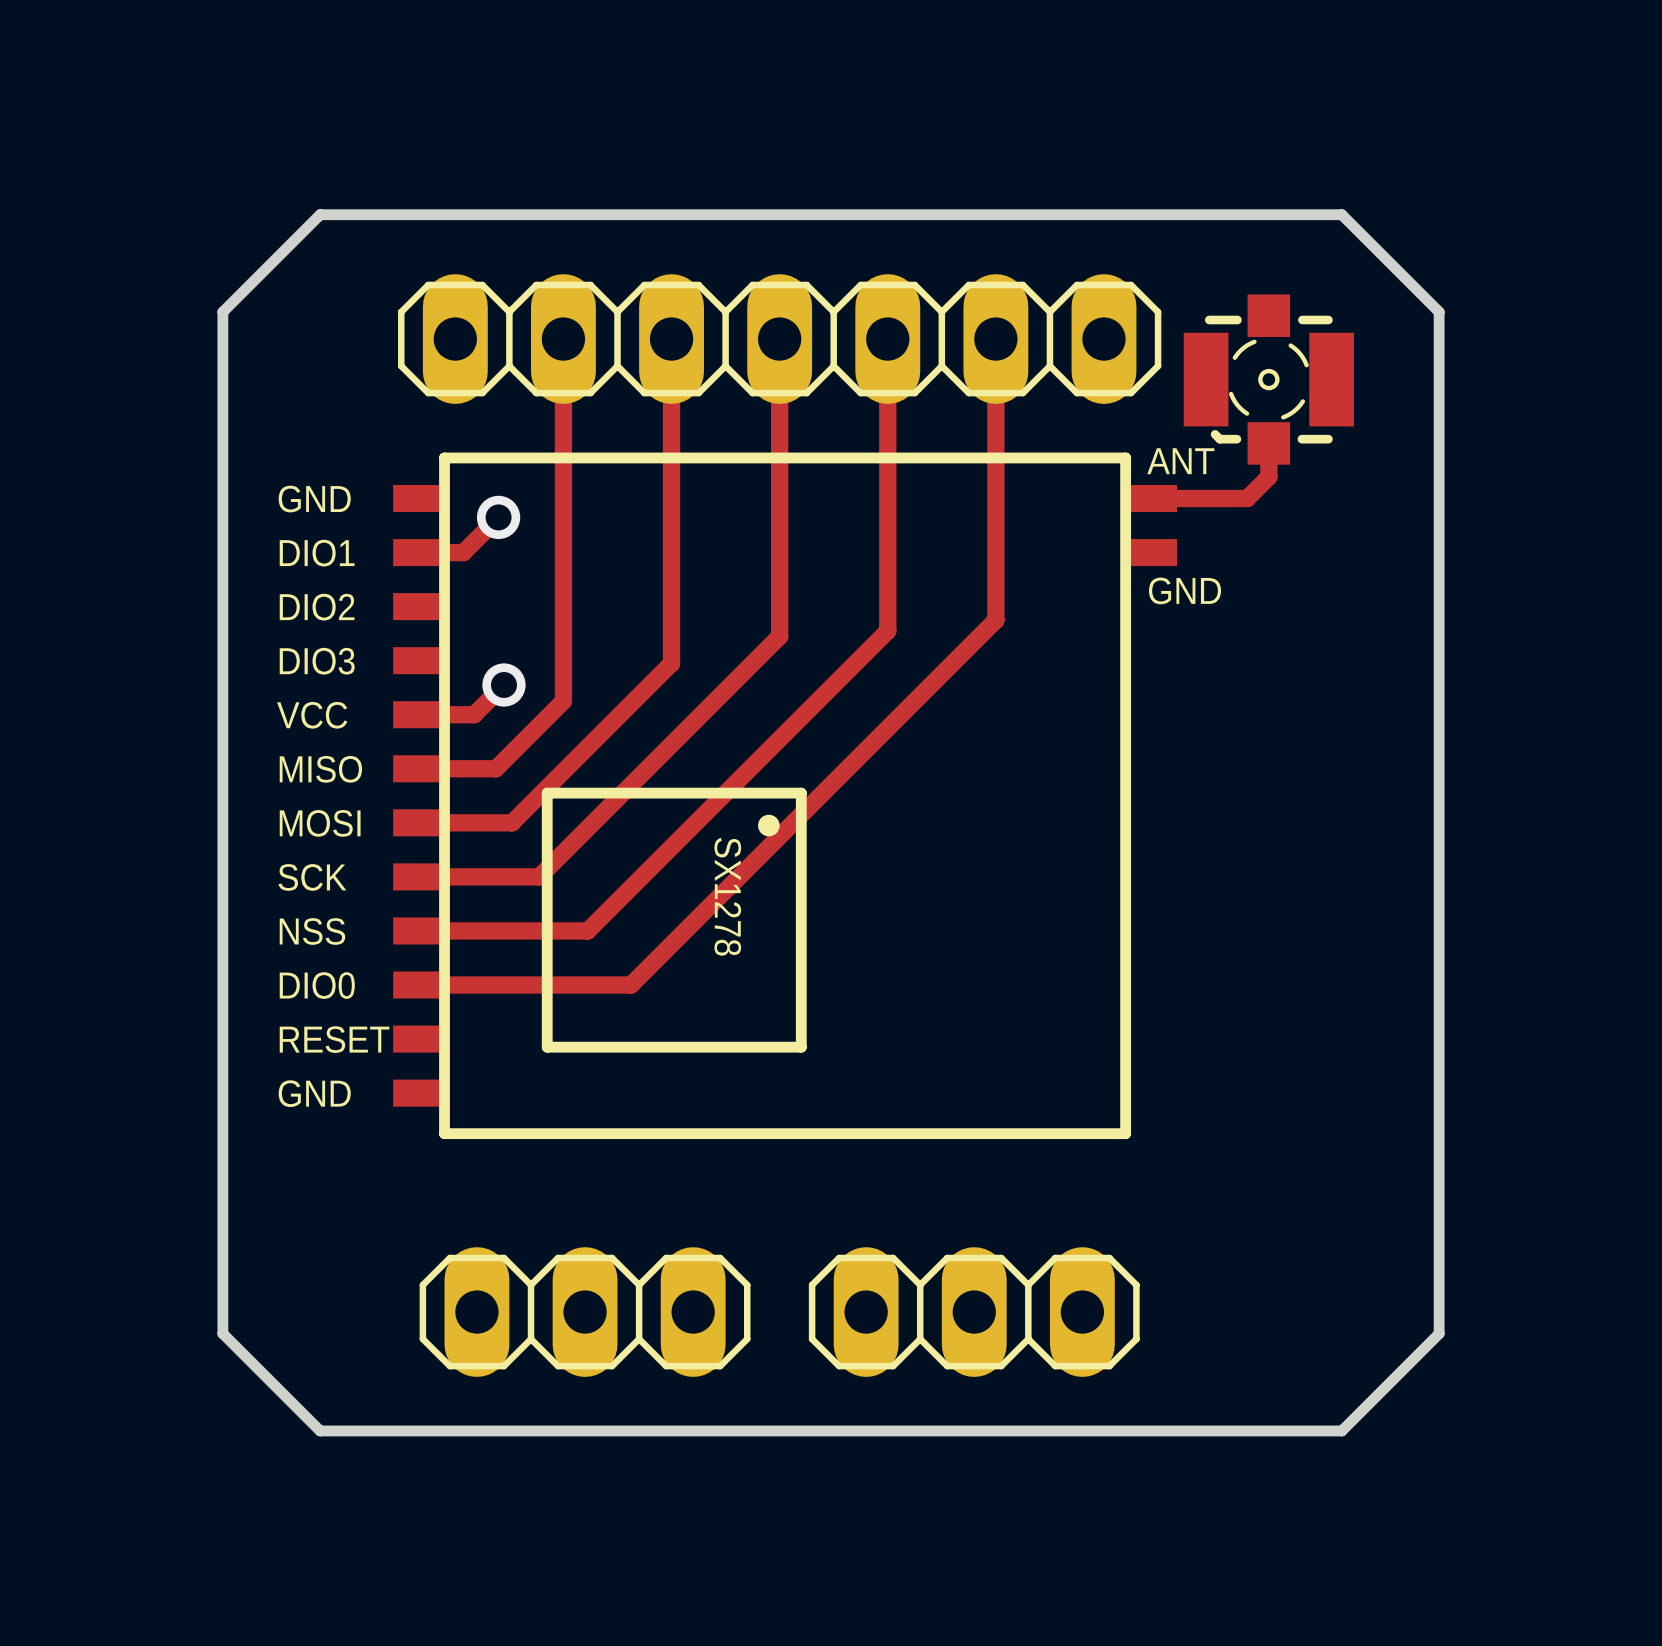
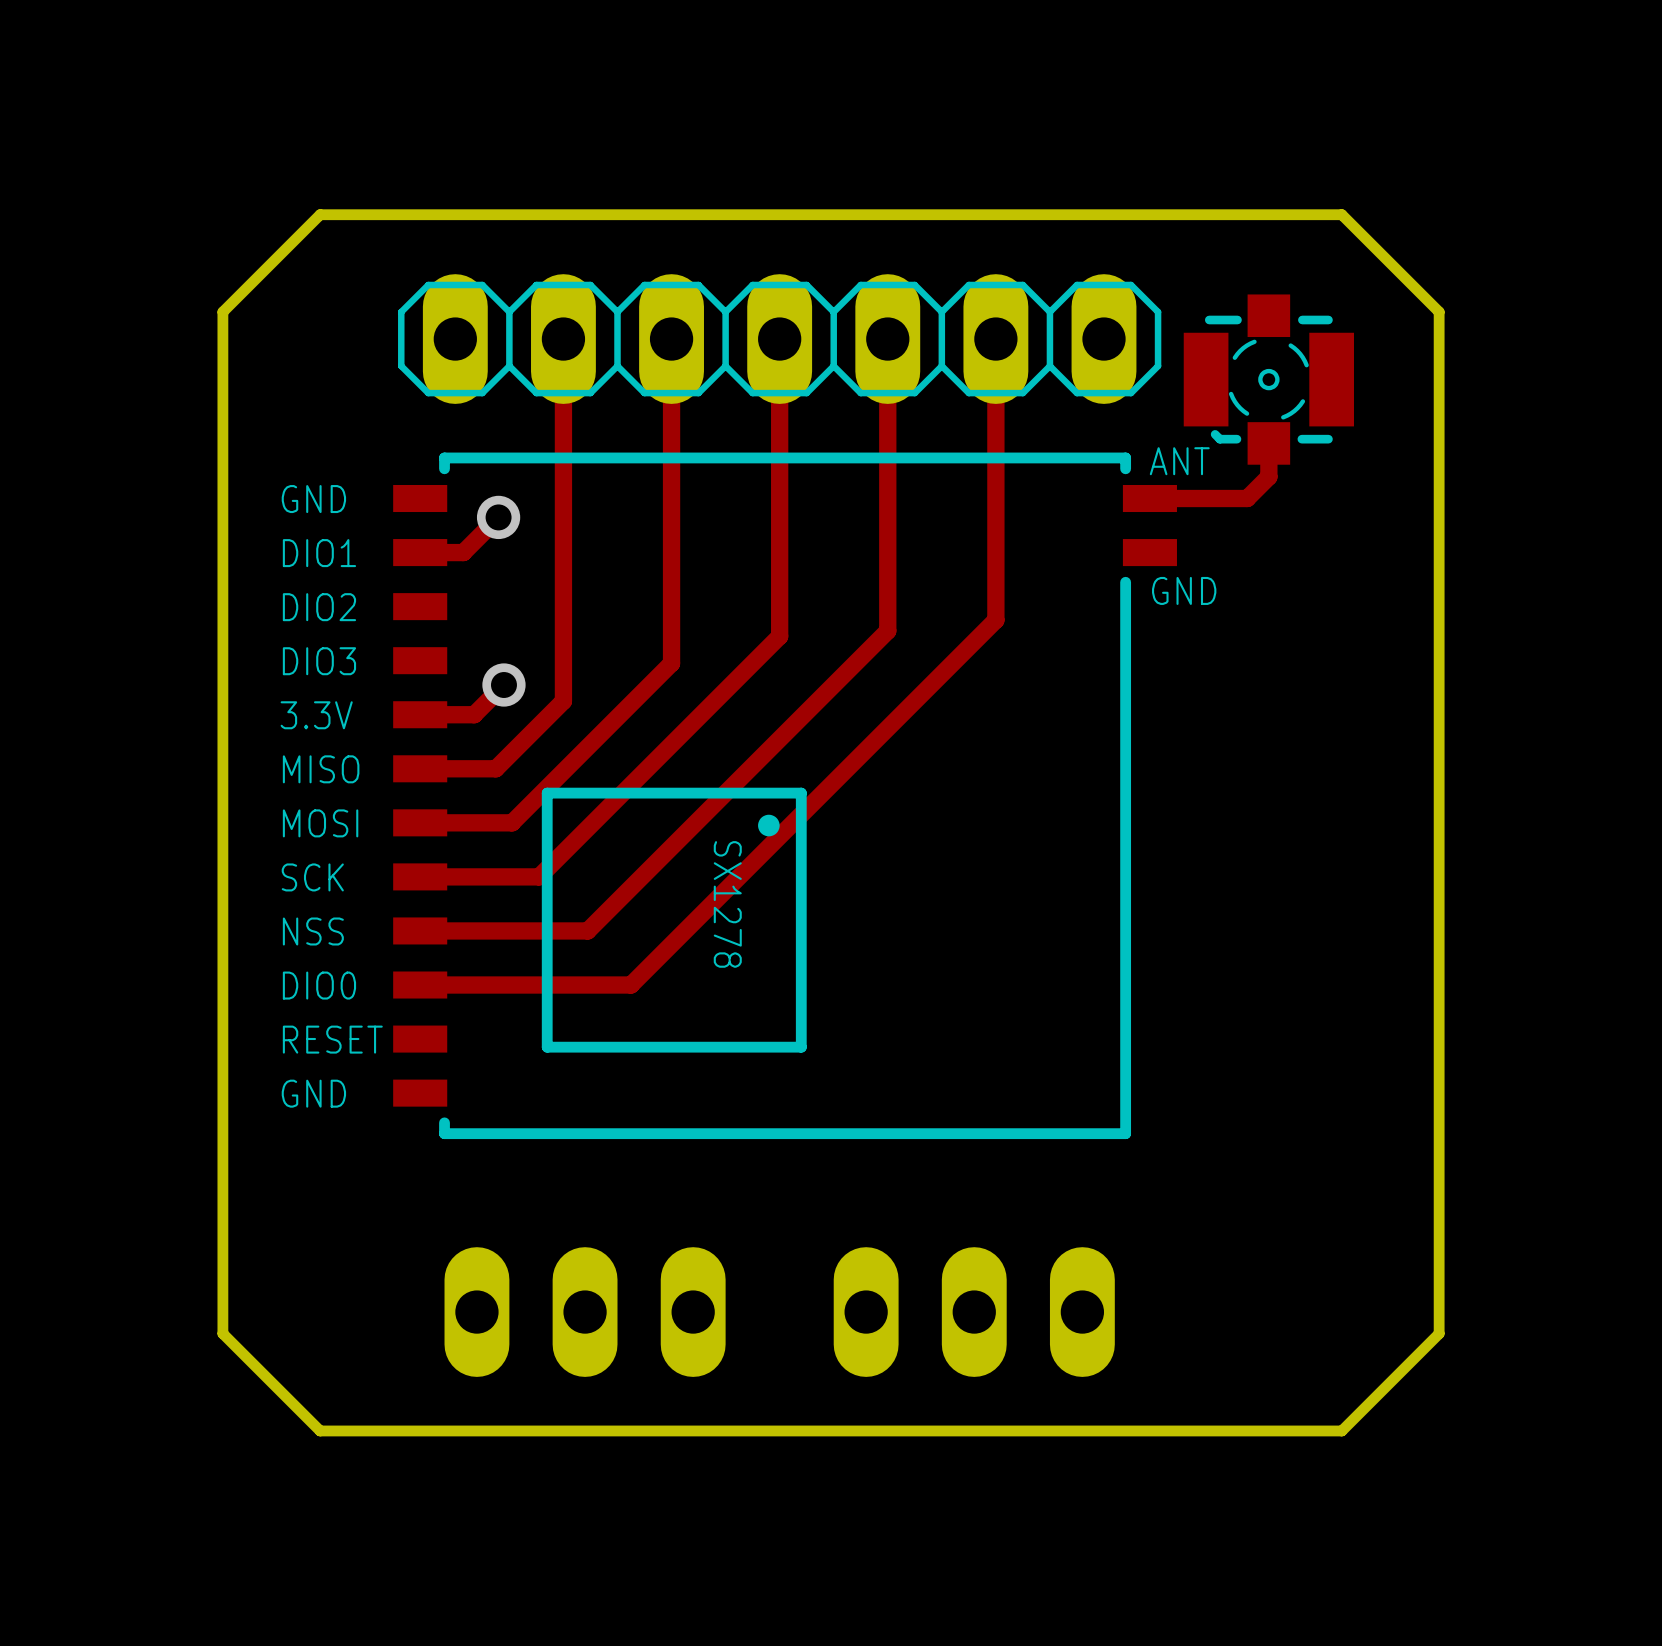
line: (444, 468) (444, 1122) -> none
line: (1125, 468) (1125, 582) -> none
VCC name: VCC (312, 715) -> 3.3V (316, 715)
part side: top (585, 1312) -> bottom (585, 1312)
part side: top (974, 1312) -> bottom (974, 1312)

